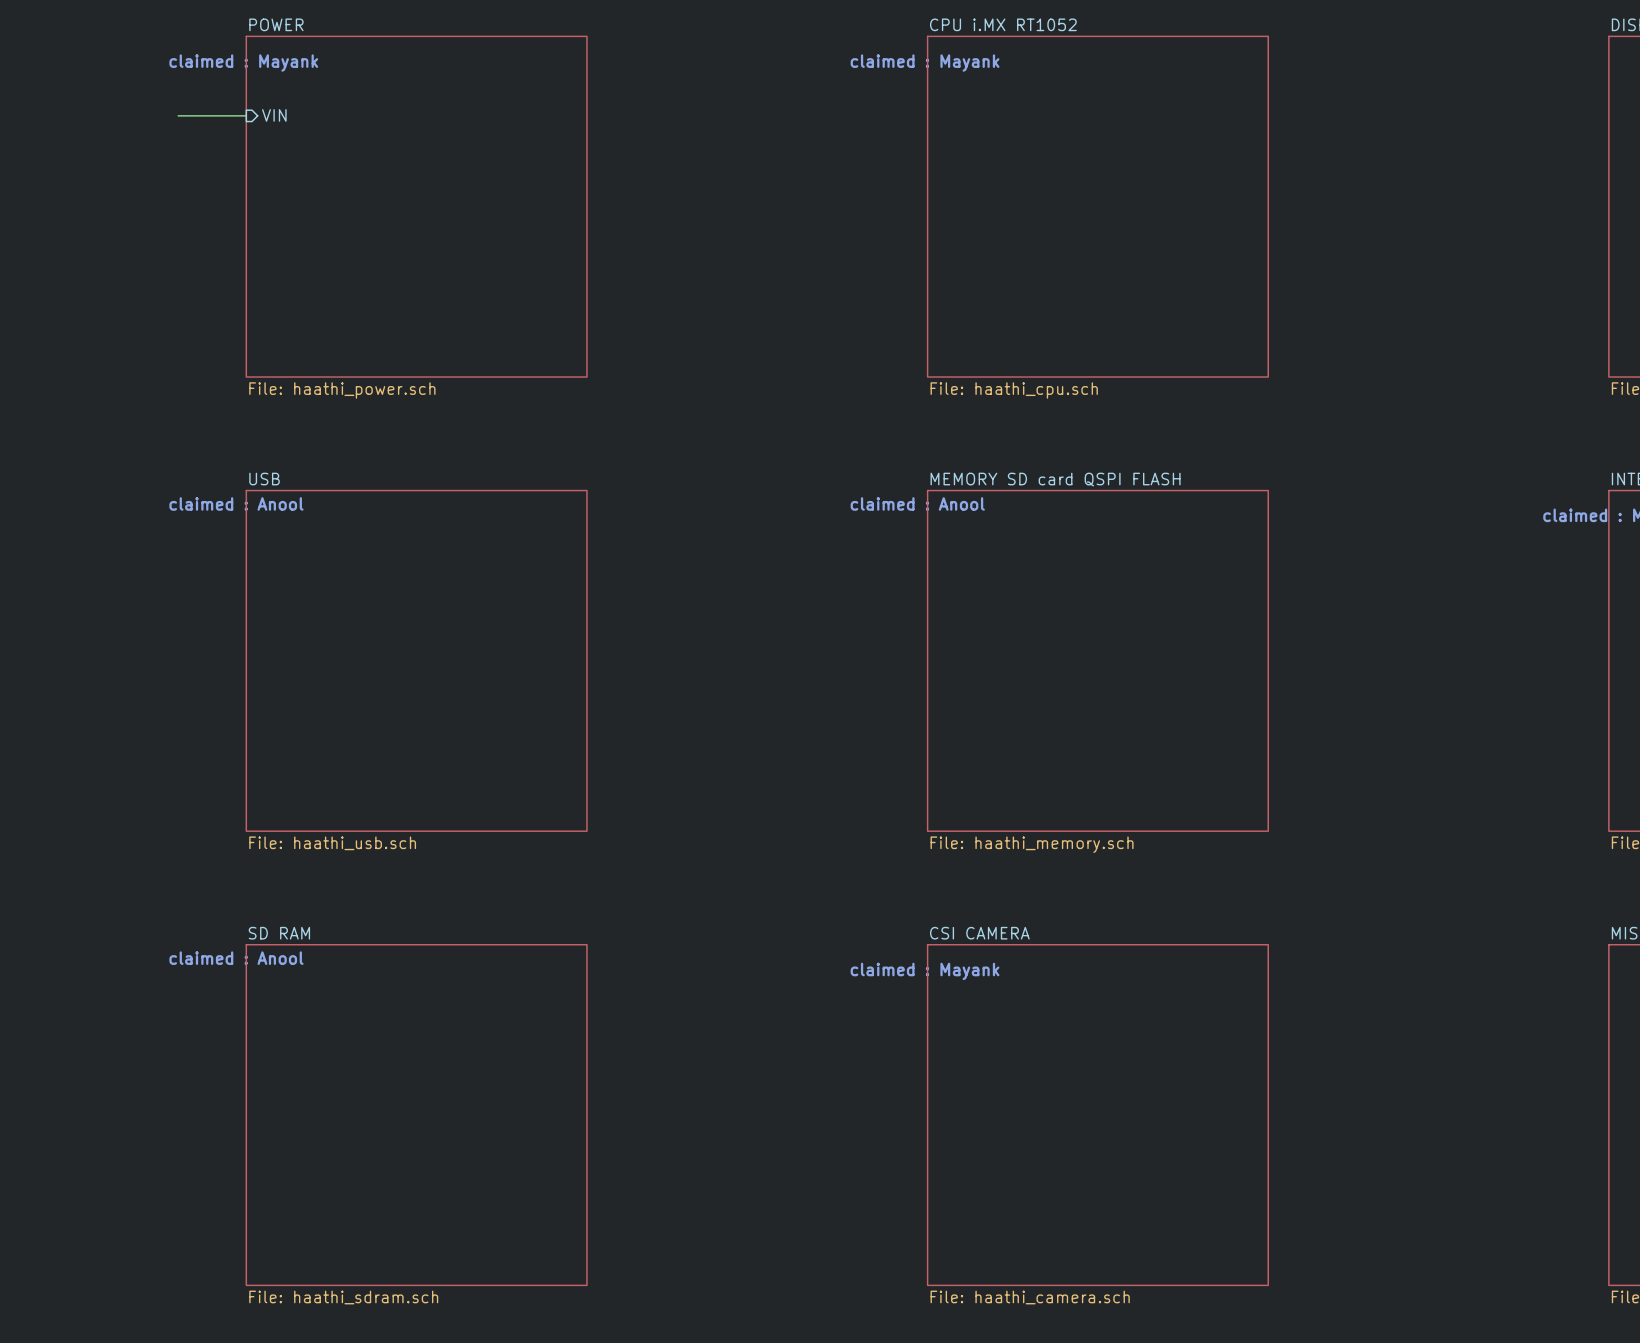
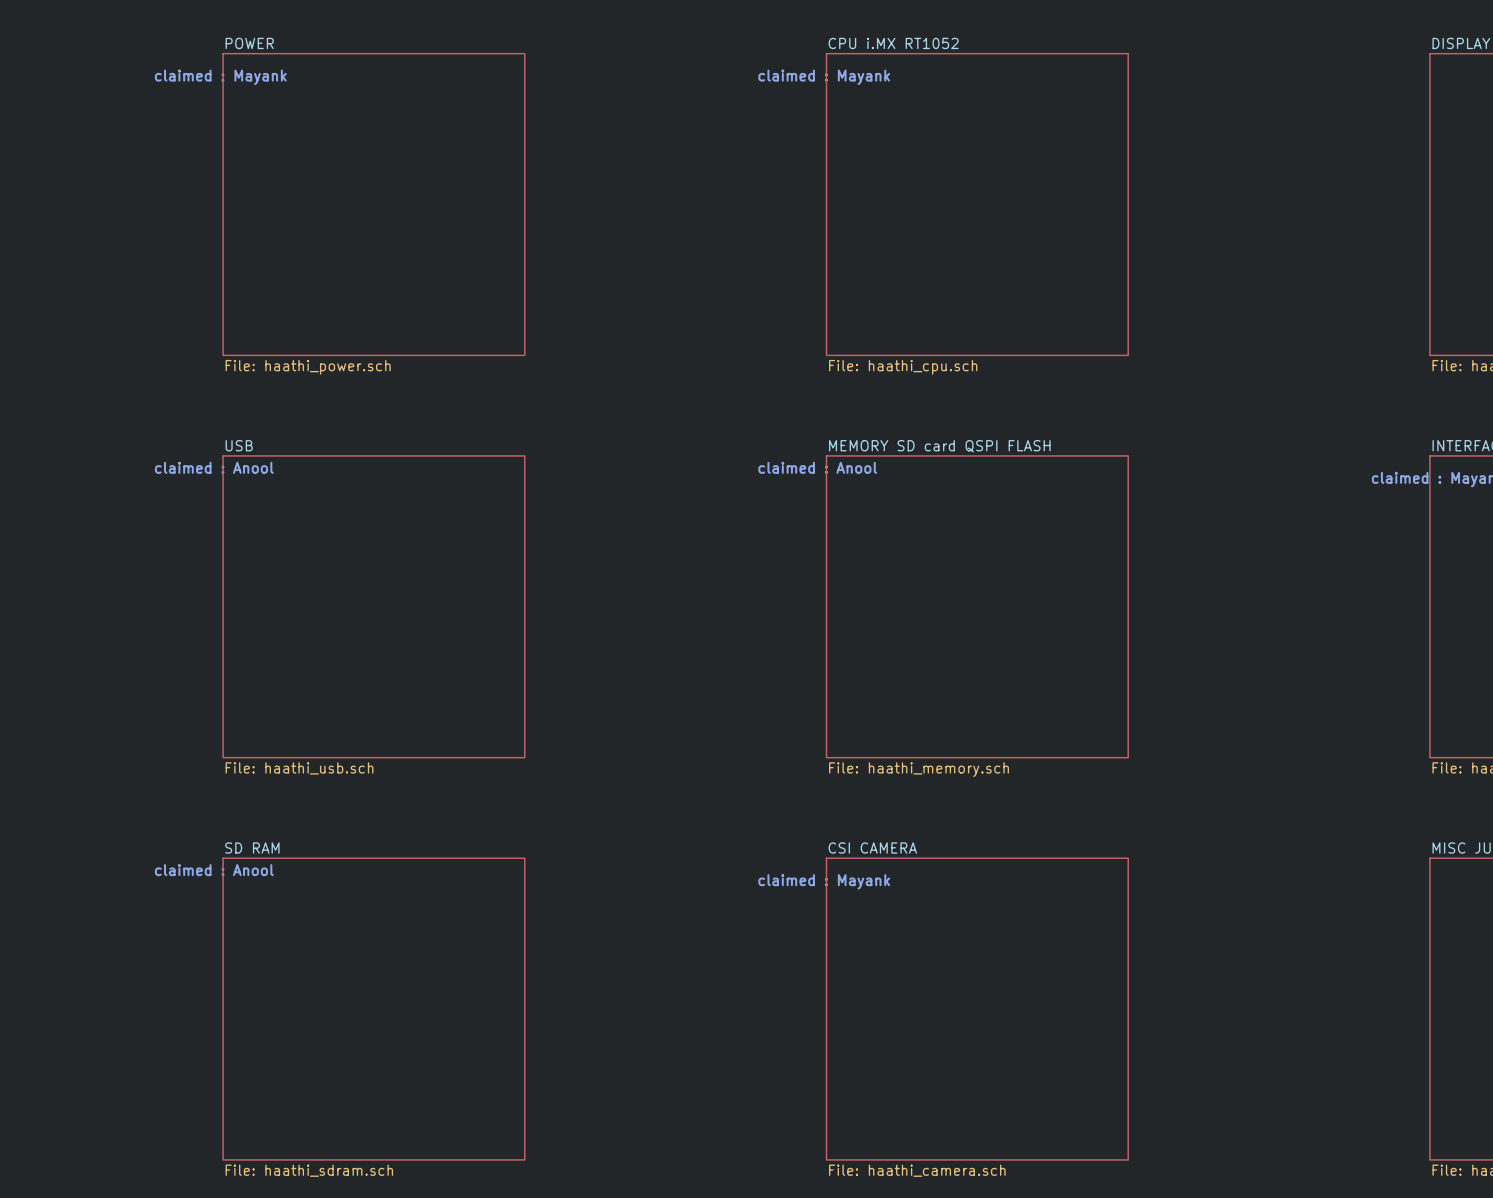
wire: (178, 115) (246, 115) -> none
sheet pin: VIN (274, 115) -> none

